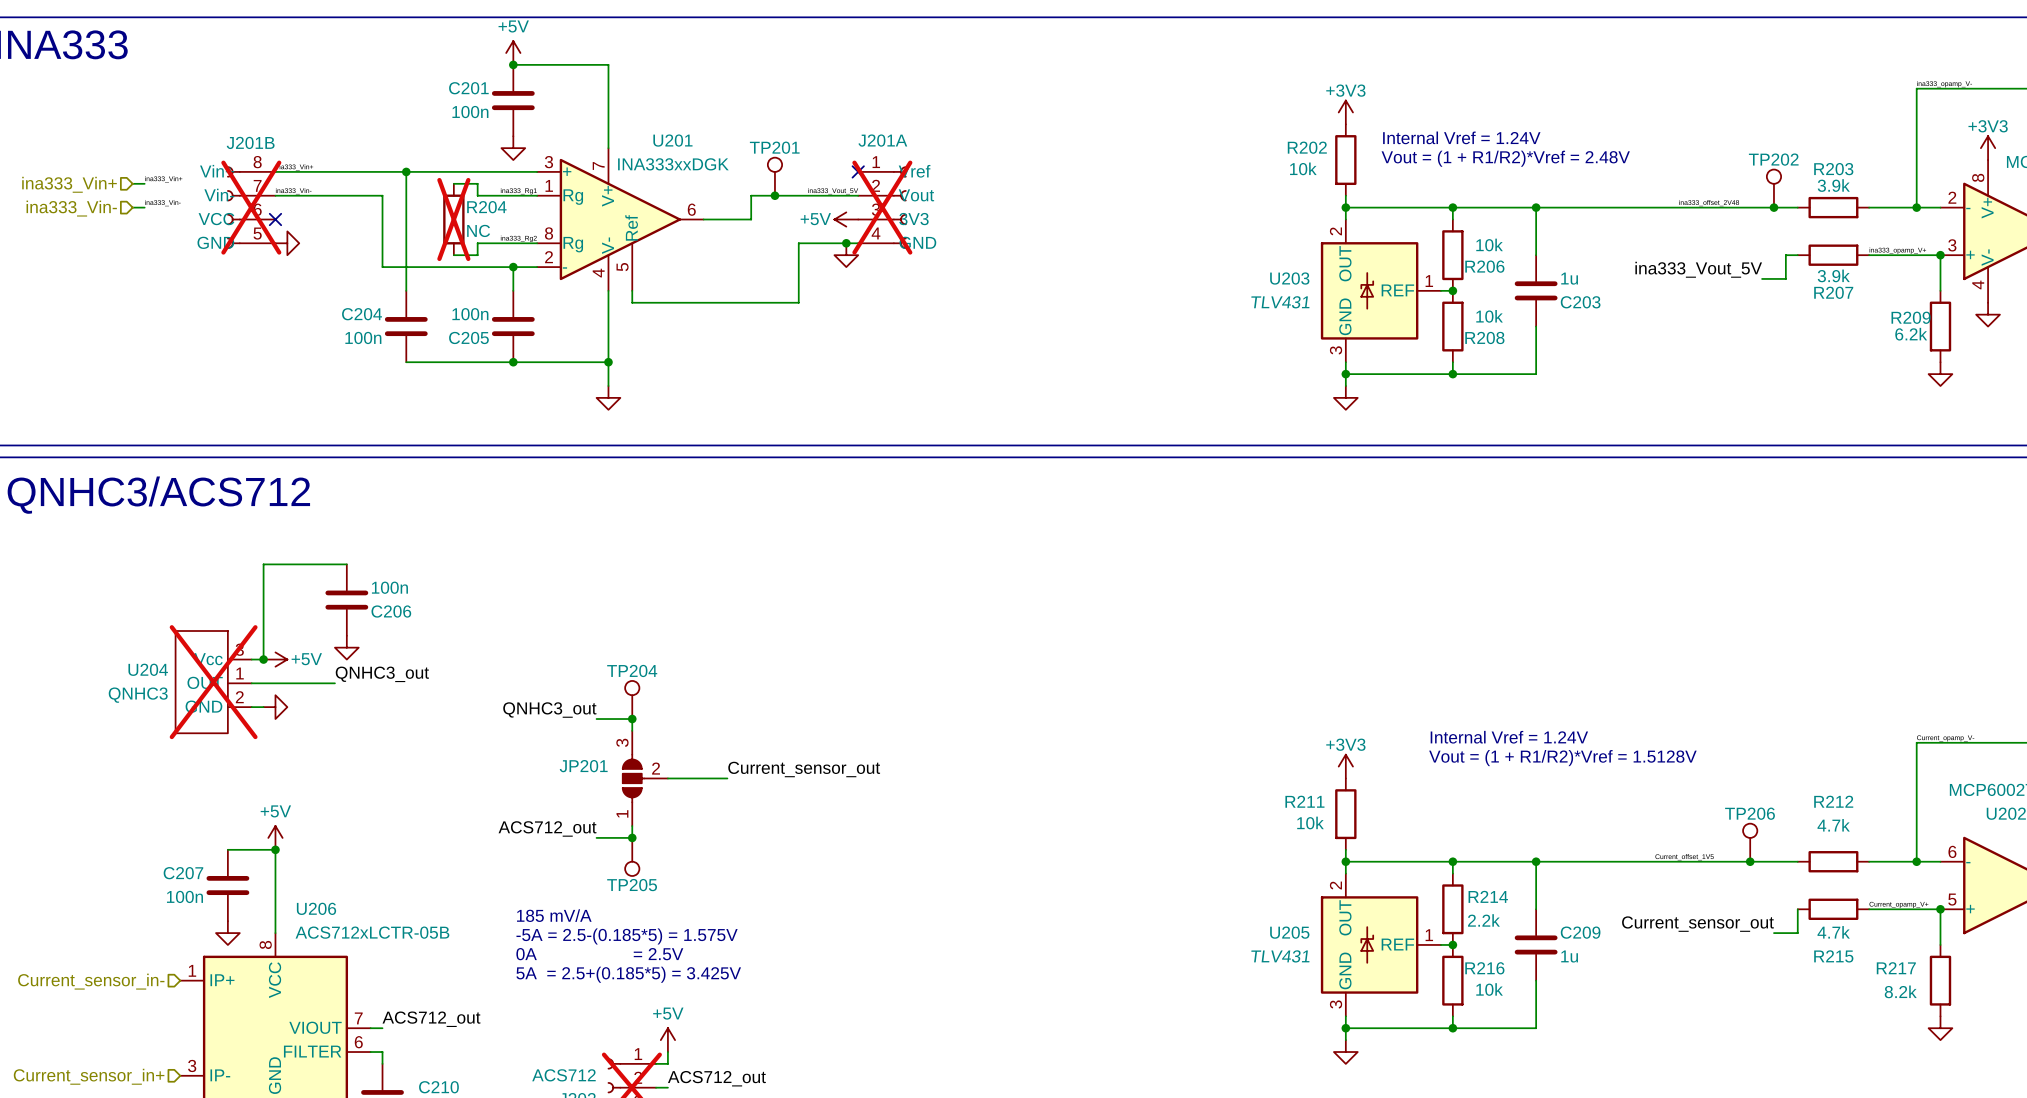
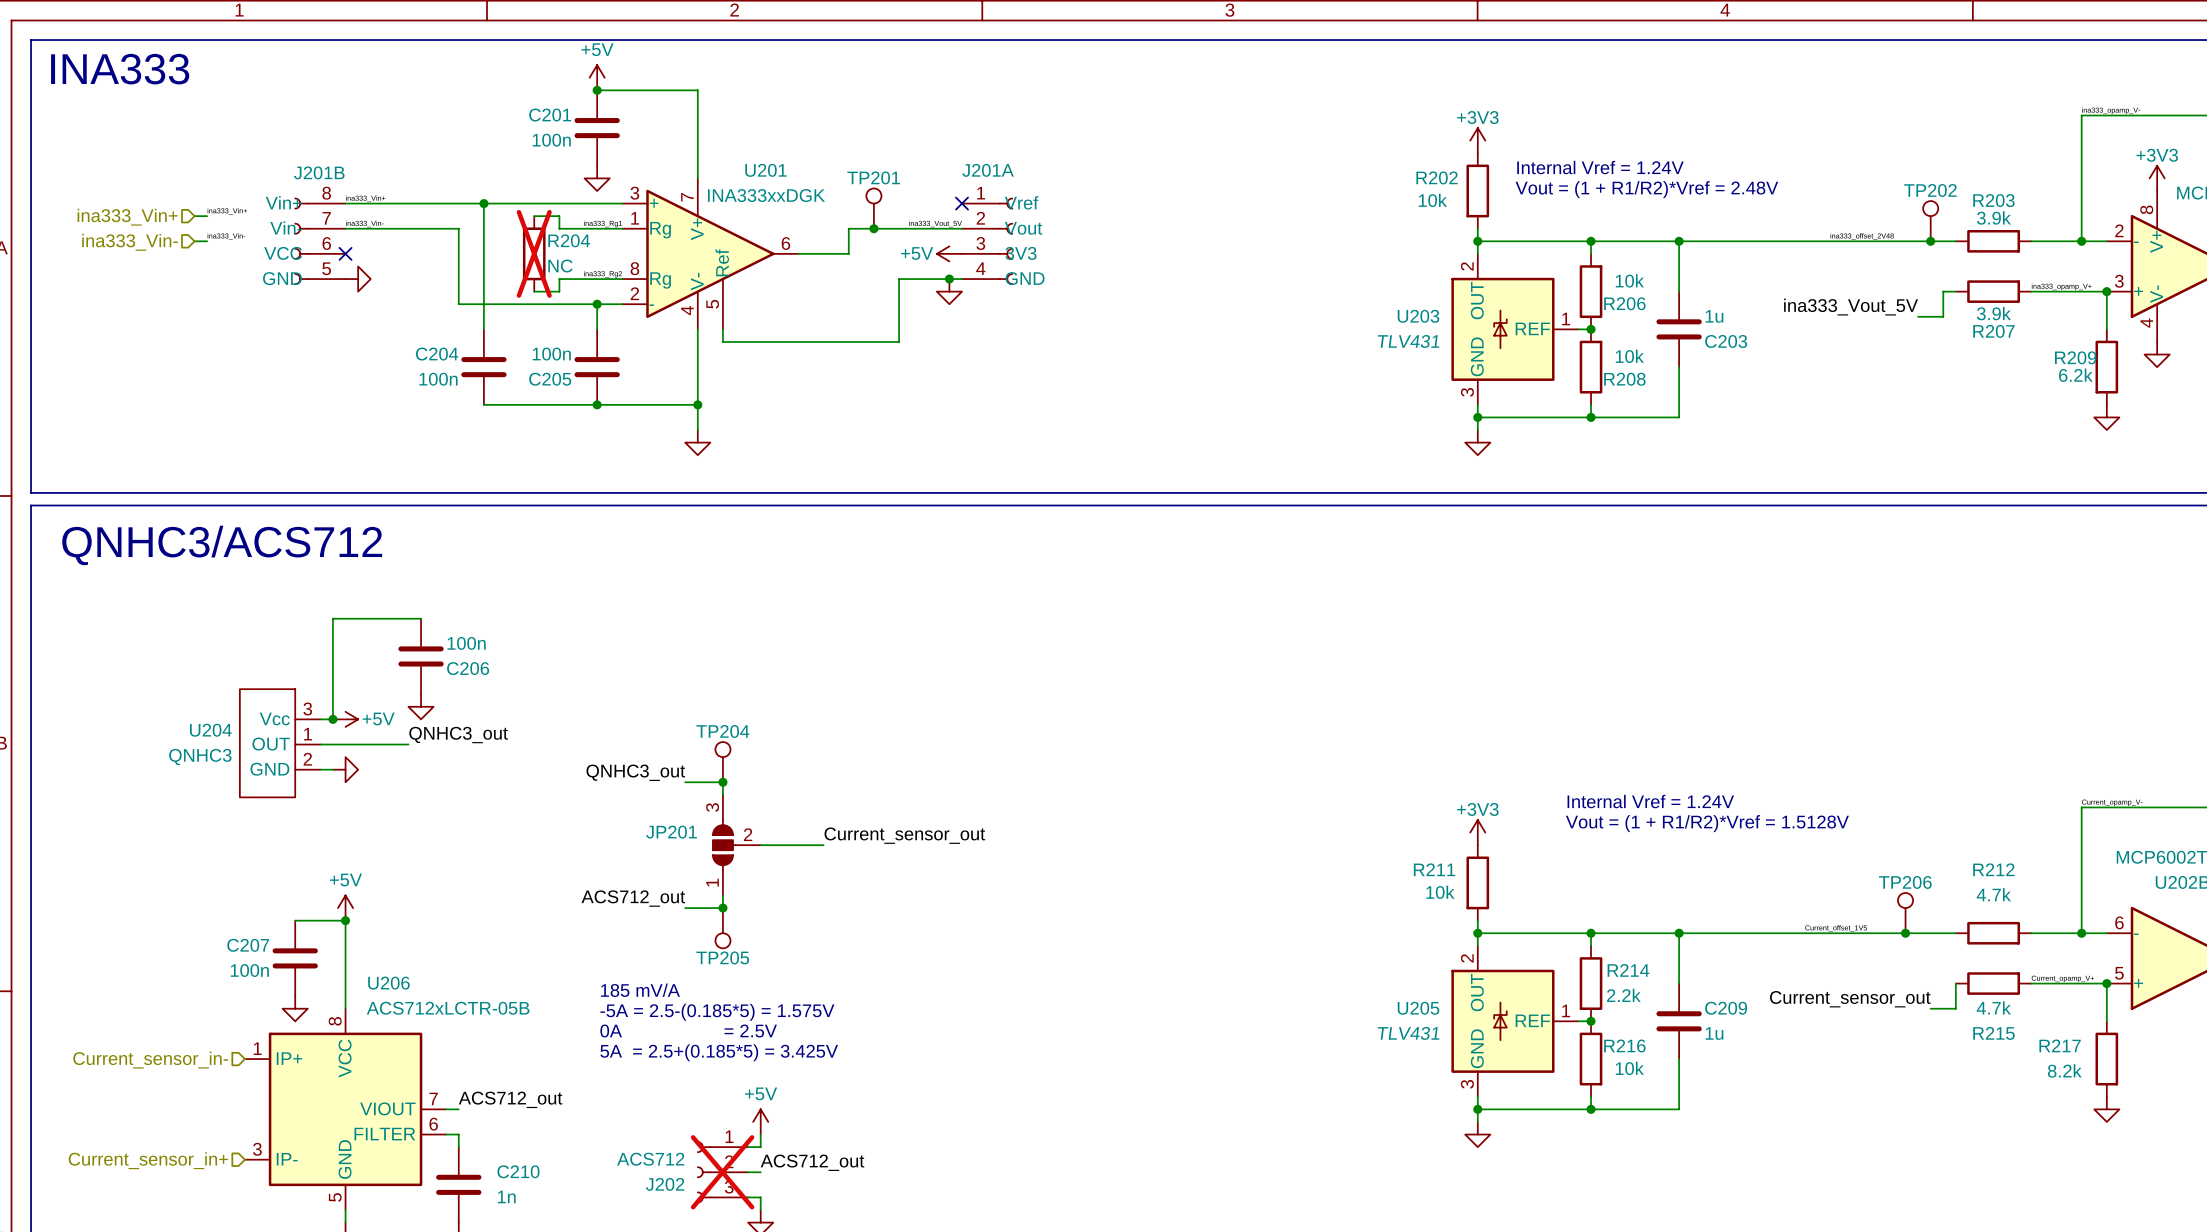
J201B do-not-place cross: (251, 207) -> none
J201A do-not-place cross: (882, 207) -> none
U204 do-not-place cross: (213, 682) -> none

